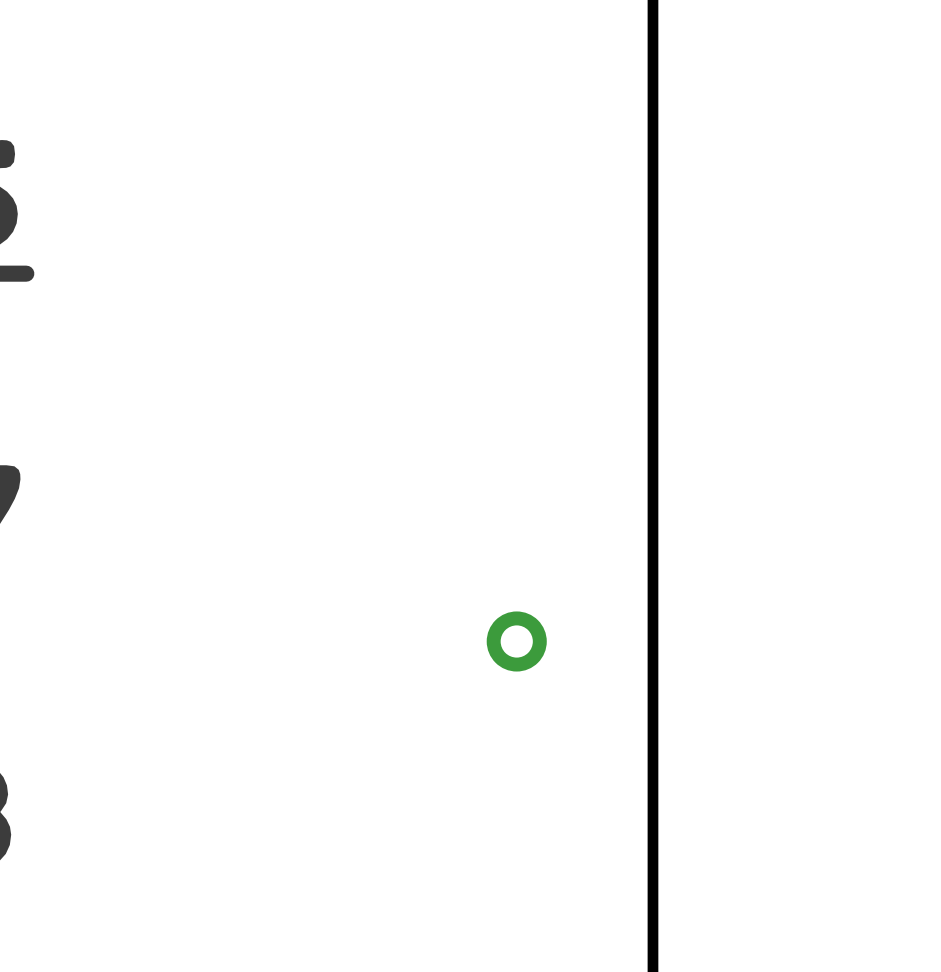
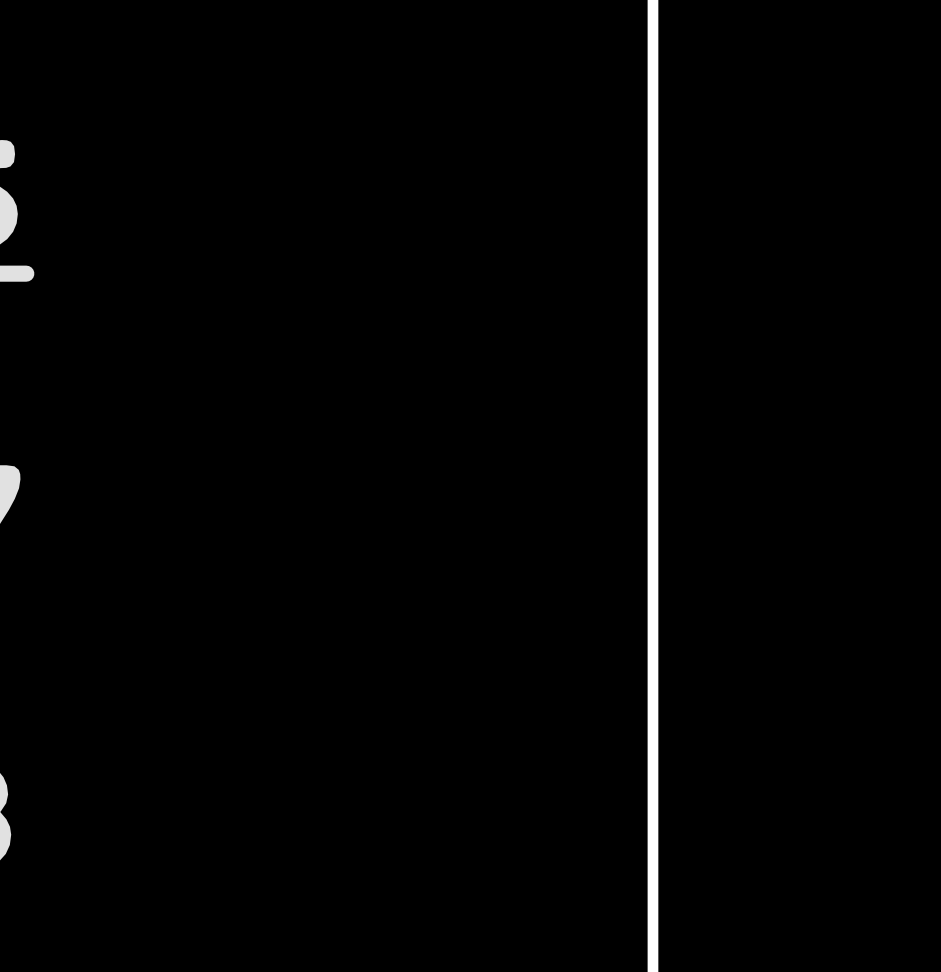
via: (516, 641) -> none

